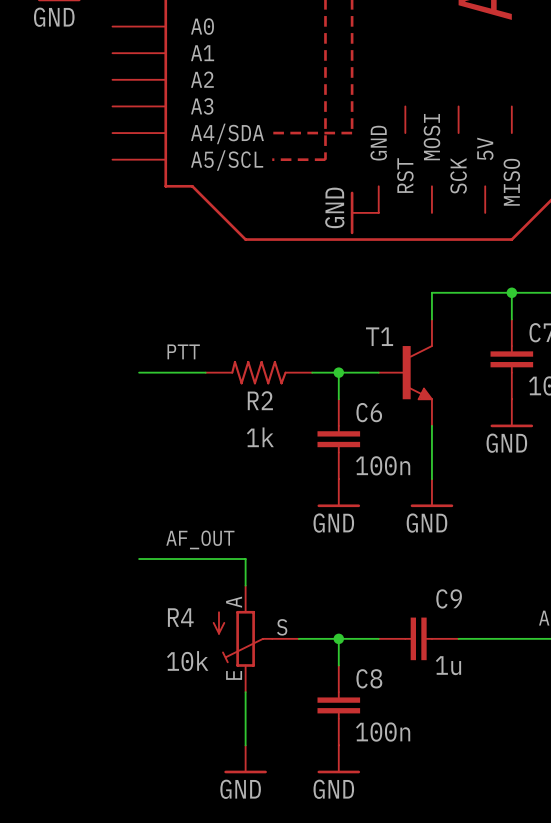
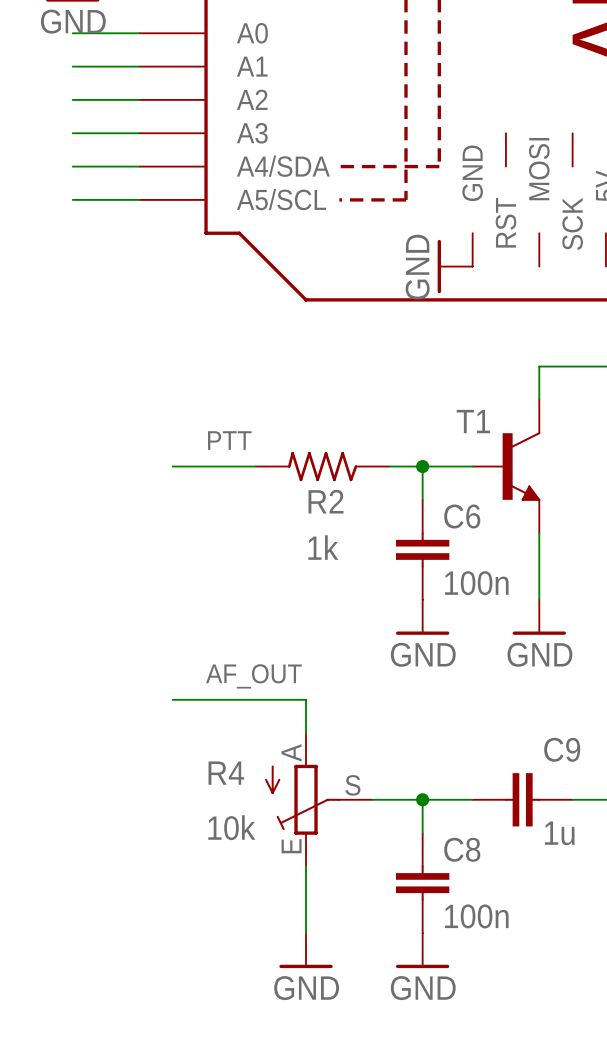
wire: none -> (72, 33) (139, 33)
wire: none -> (72, 66) (139, 66)
wire: none -> (72, 99) (139, 99)
wire: none -> (72, 133) (139, 133)
wire: none -> (72, 166) (139, 166)
wire: none -> (72, 199) (139, 199)

